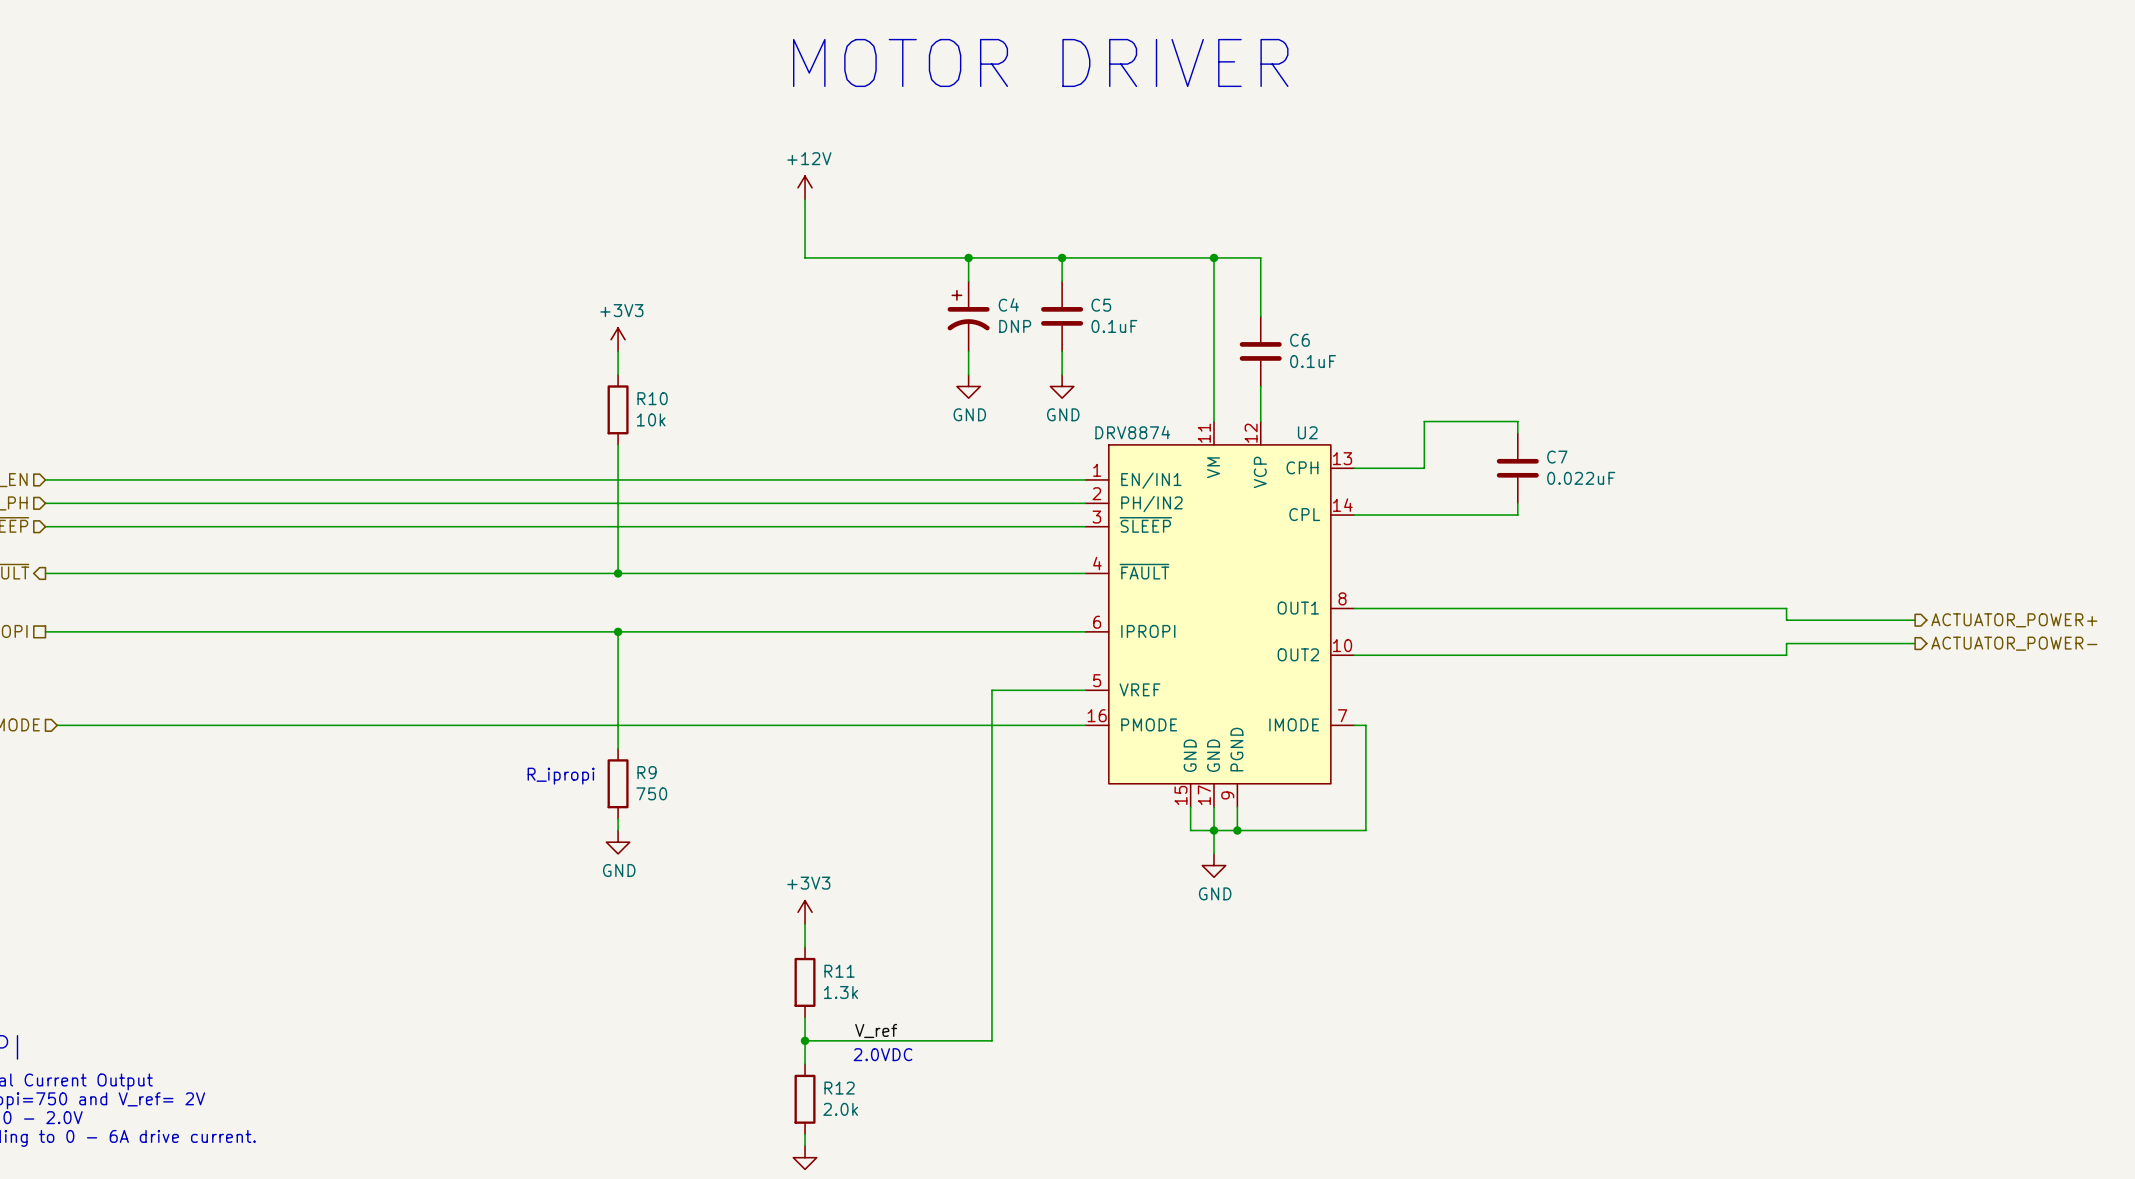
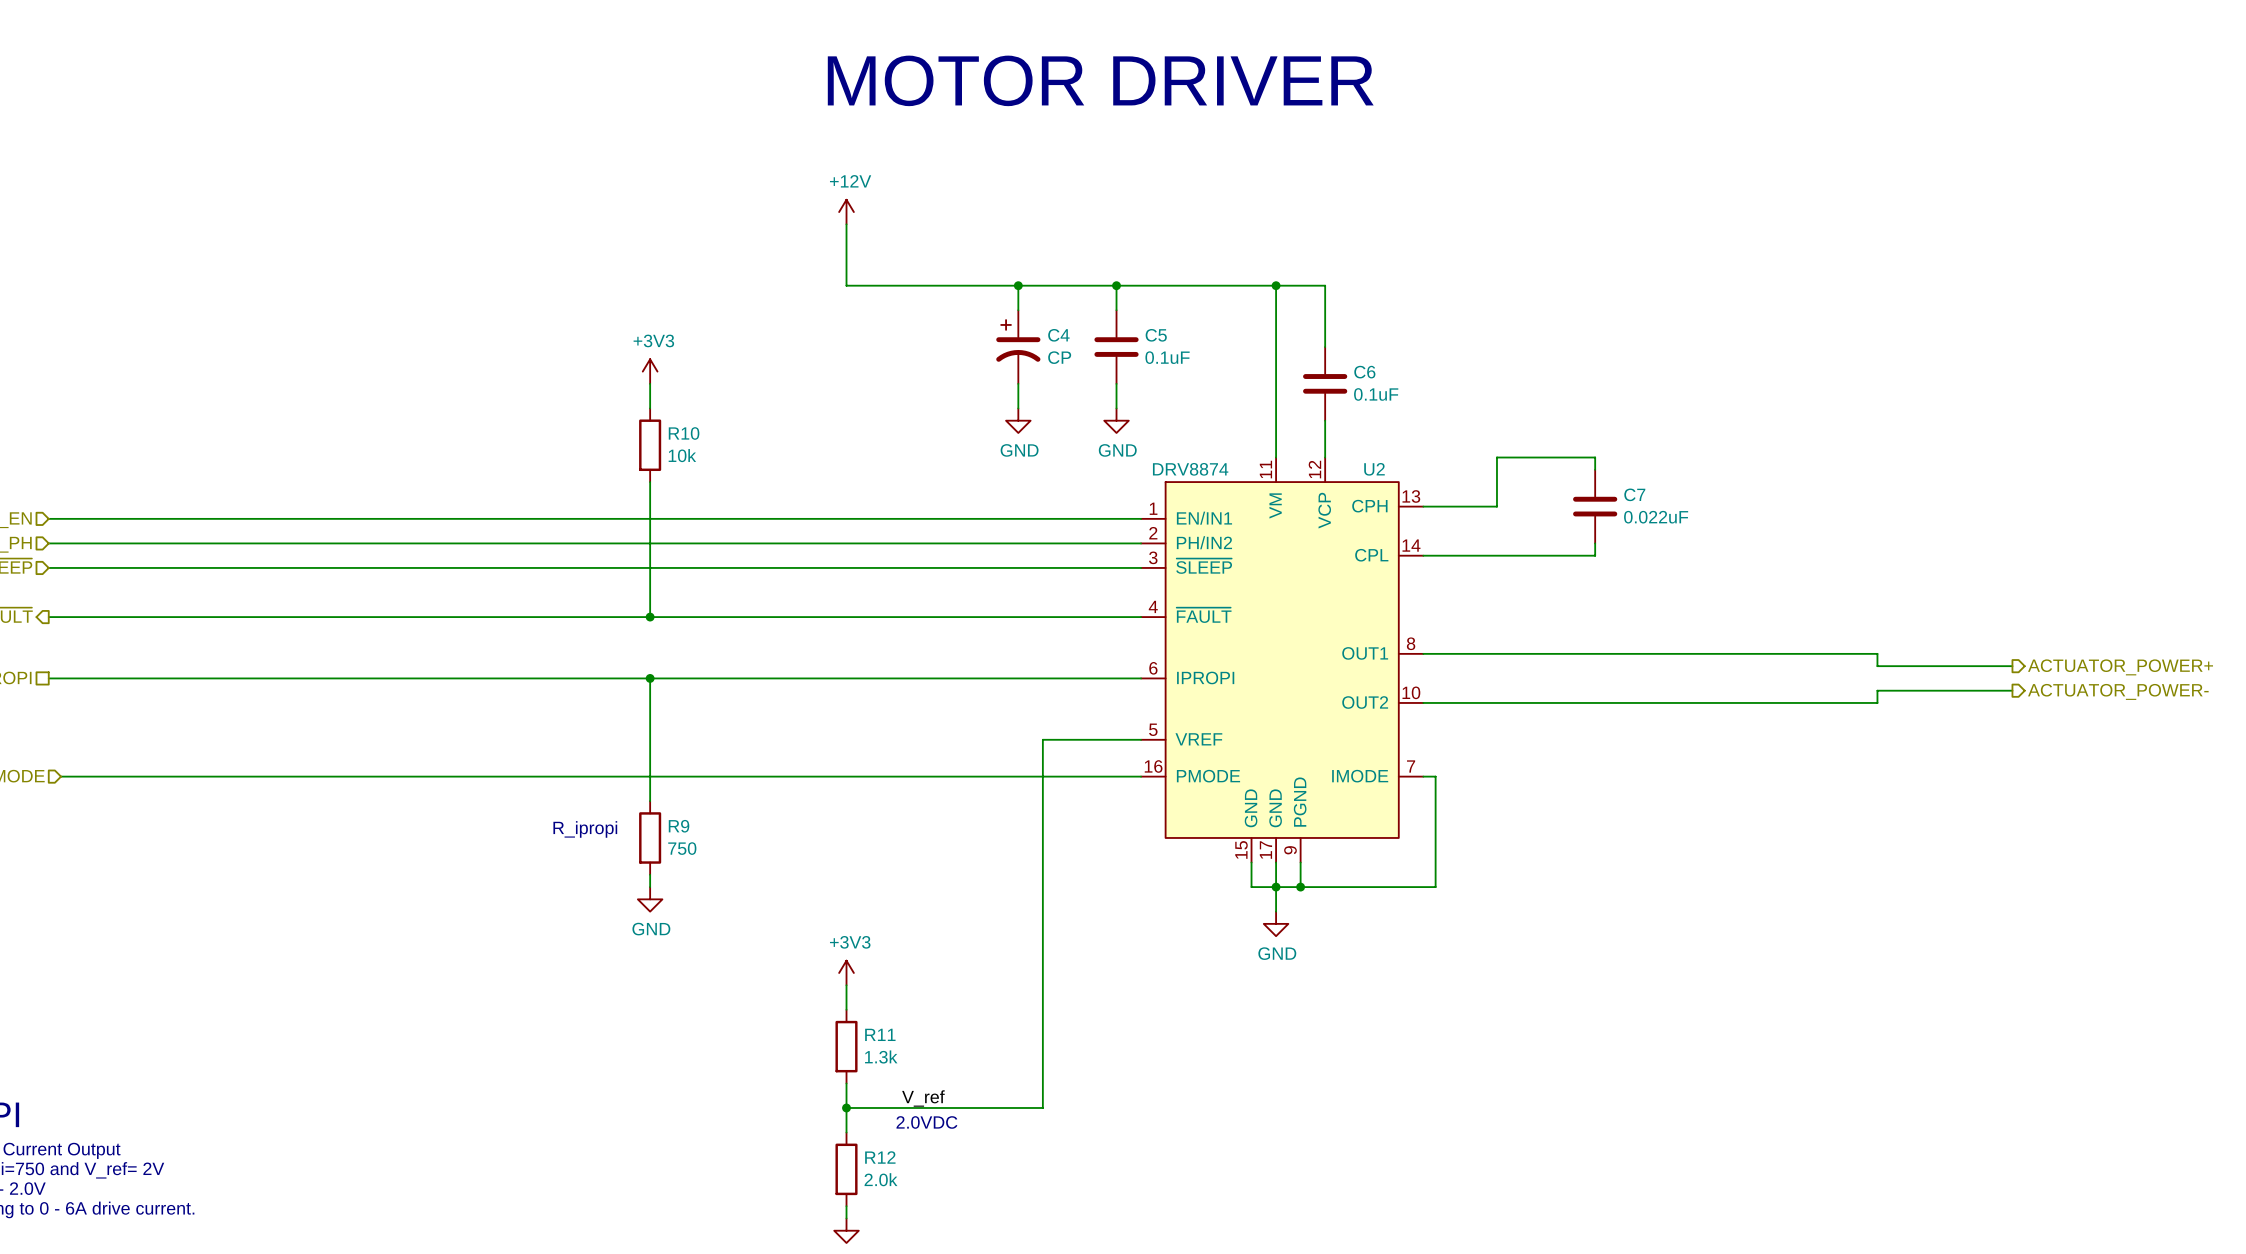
C4 value: DNP (1015, 326) -> CP (1059, 357)

